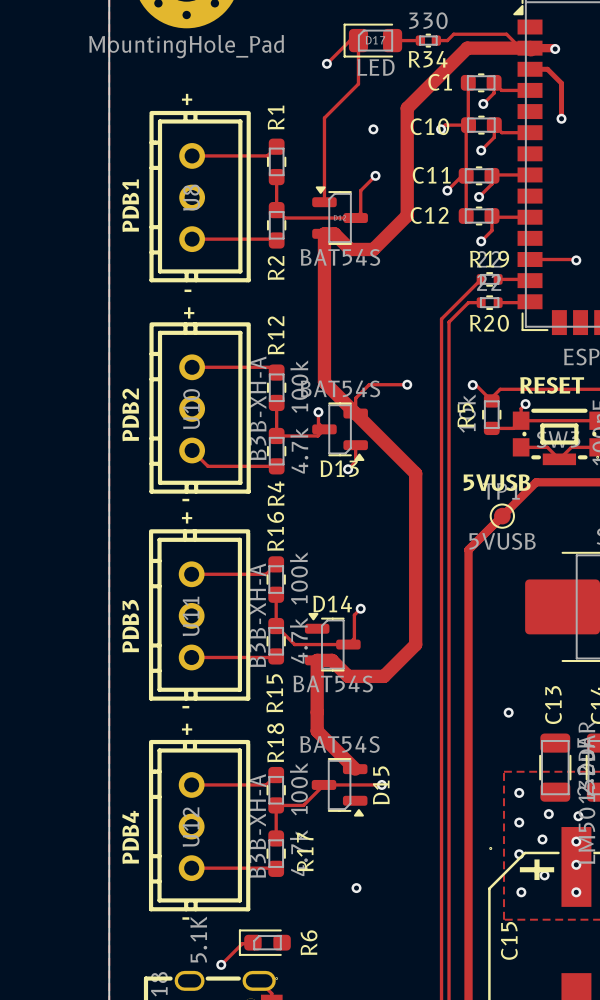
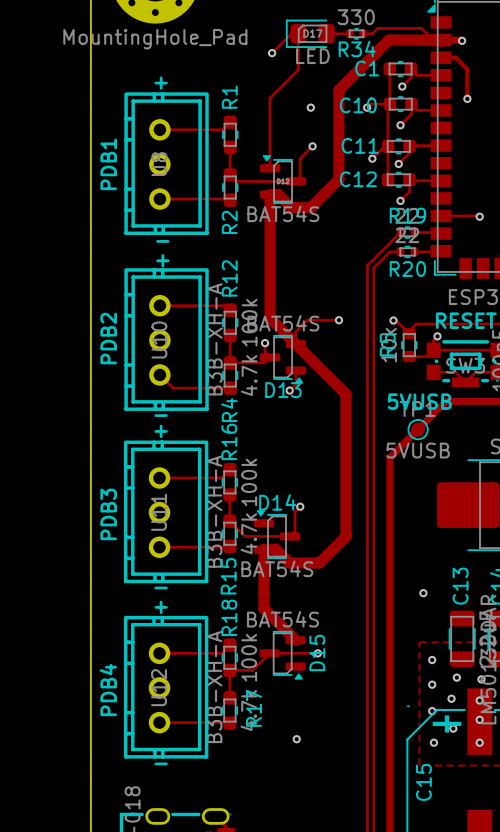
R6: 5.1K (264, 942) -> none
track: (249, 943) (242, 943) (221, 964) -> none
via: (221, 964) -> none

